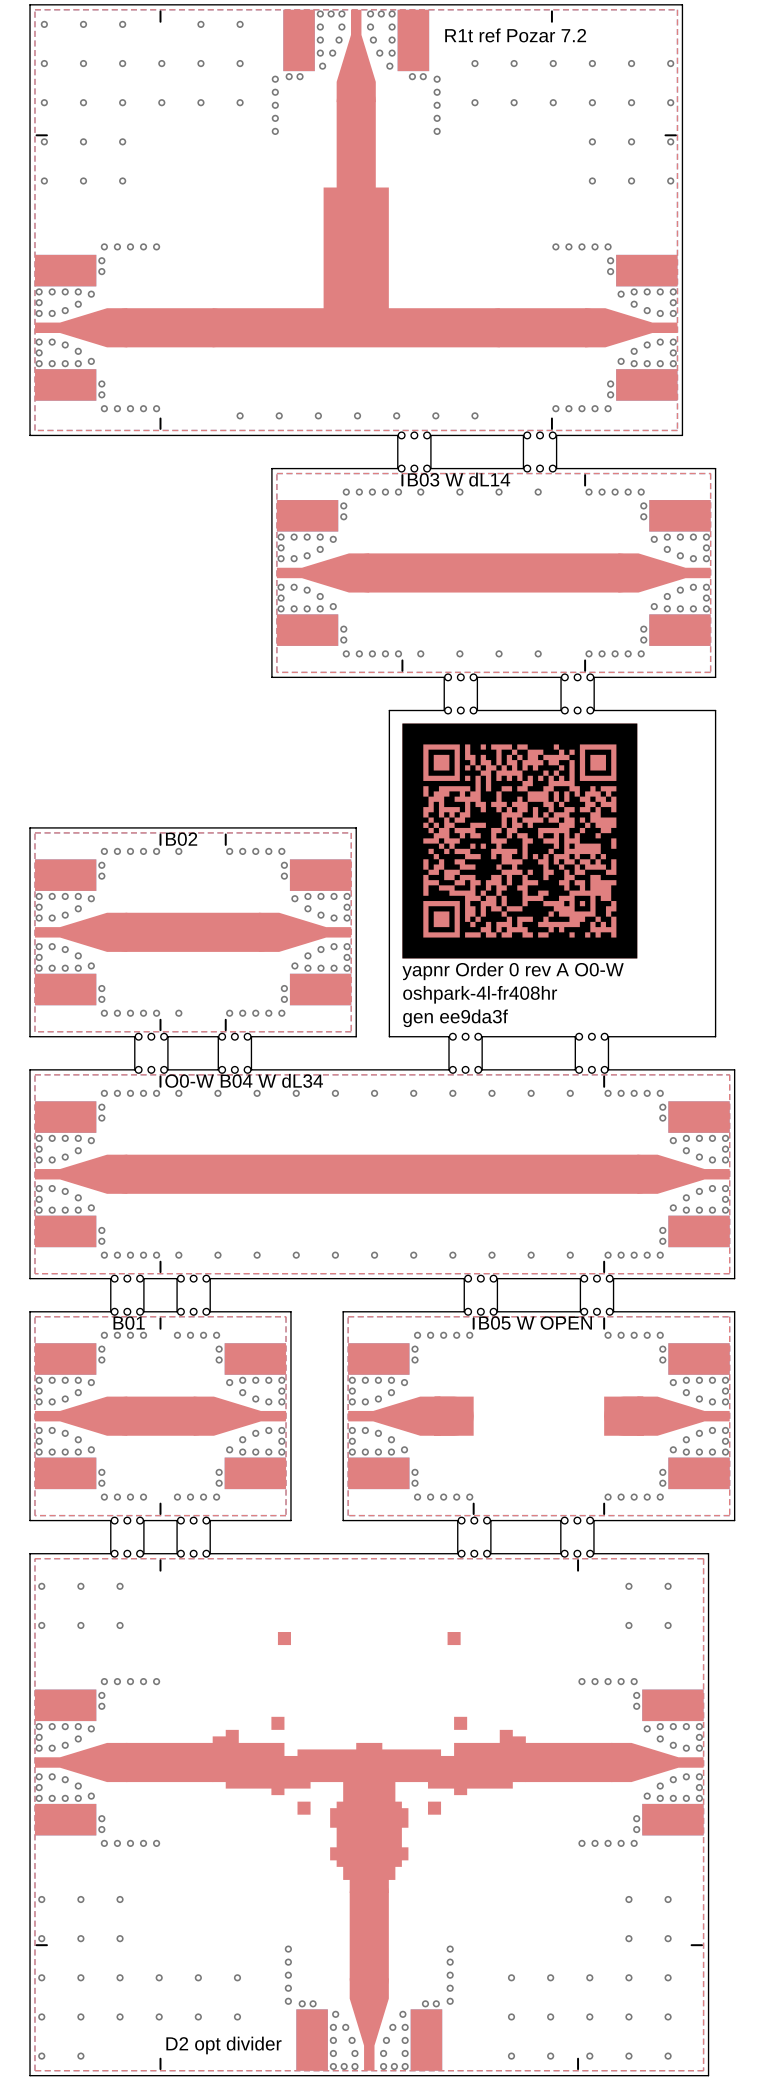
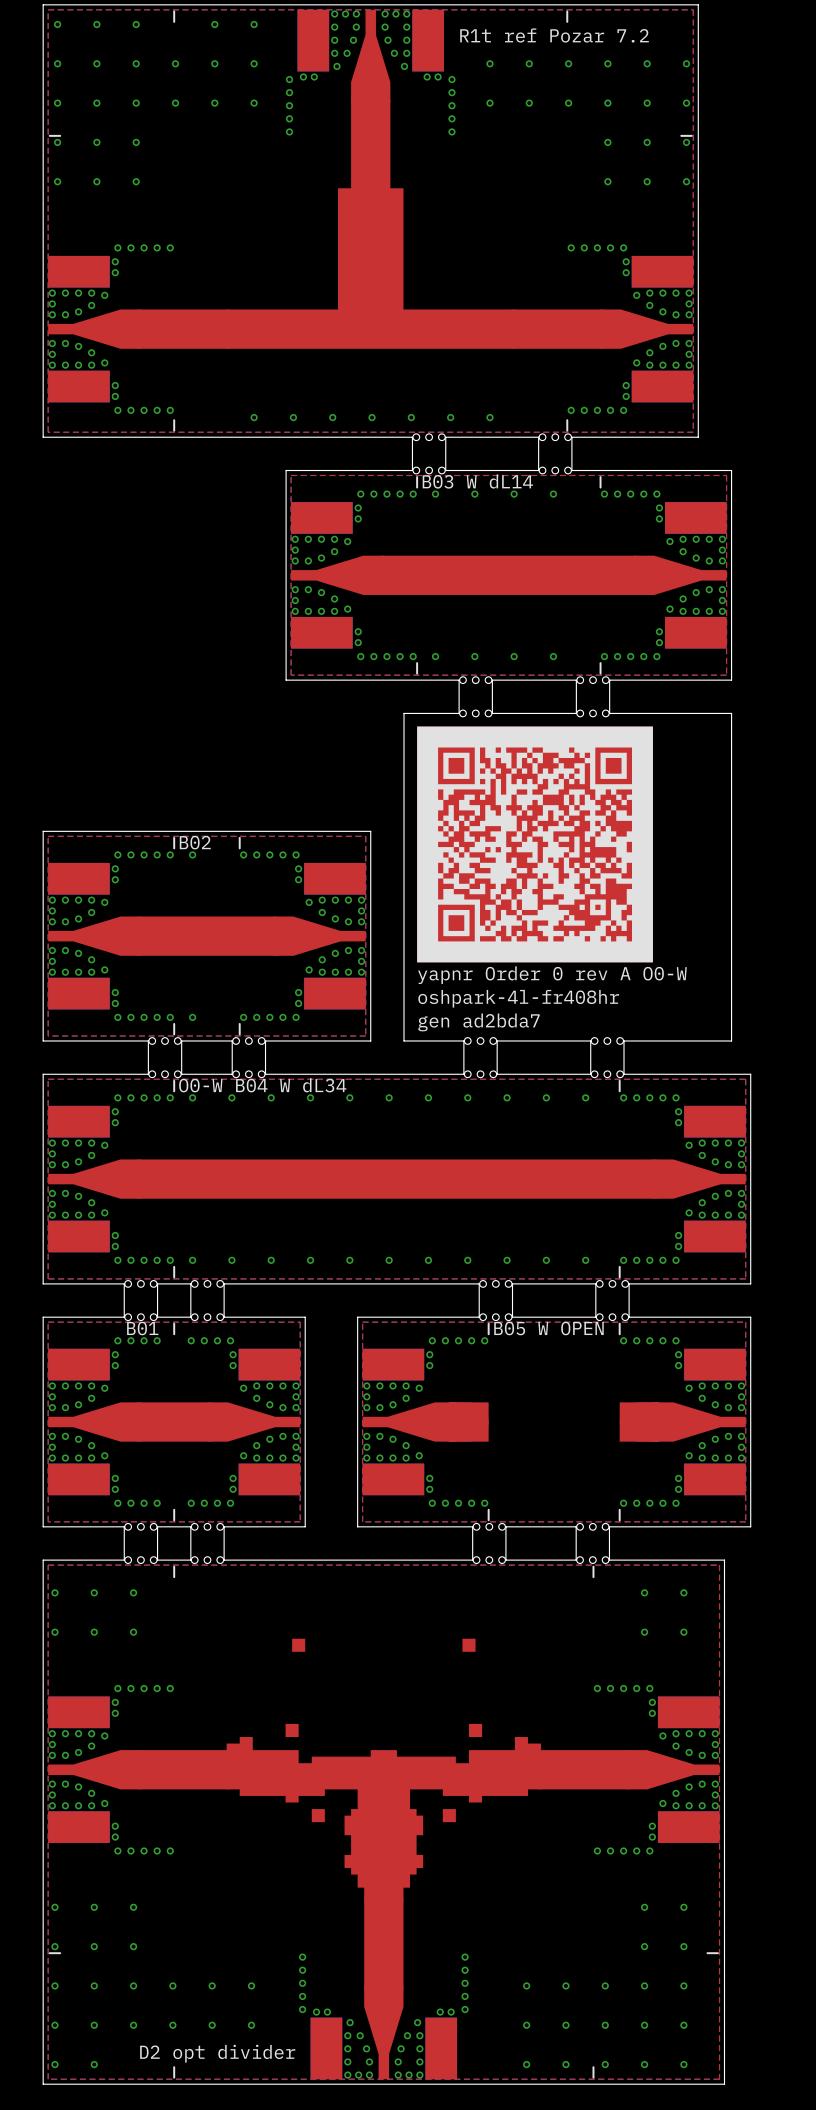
text: gen ee9da3f (455, 1018) -> gen ad2bda7 (479, 1022)

